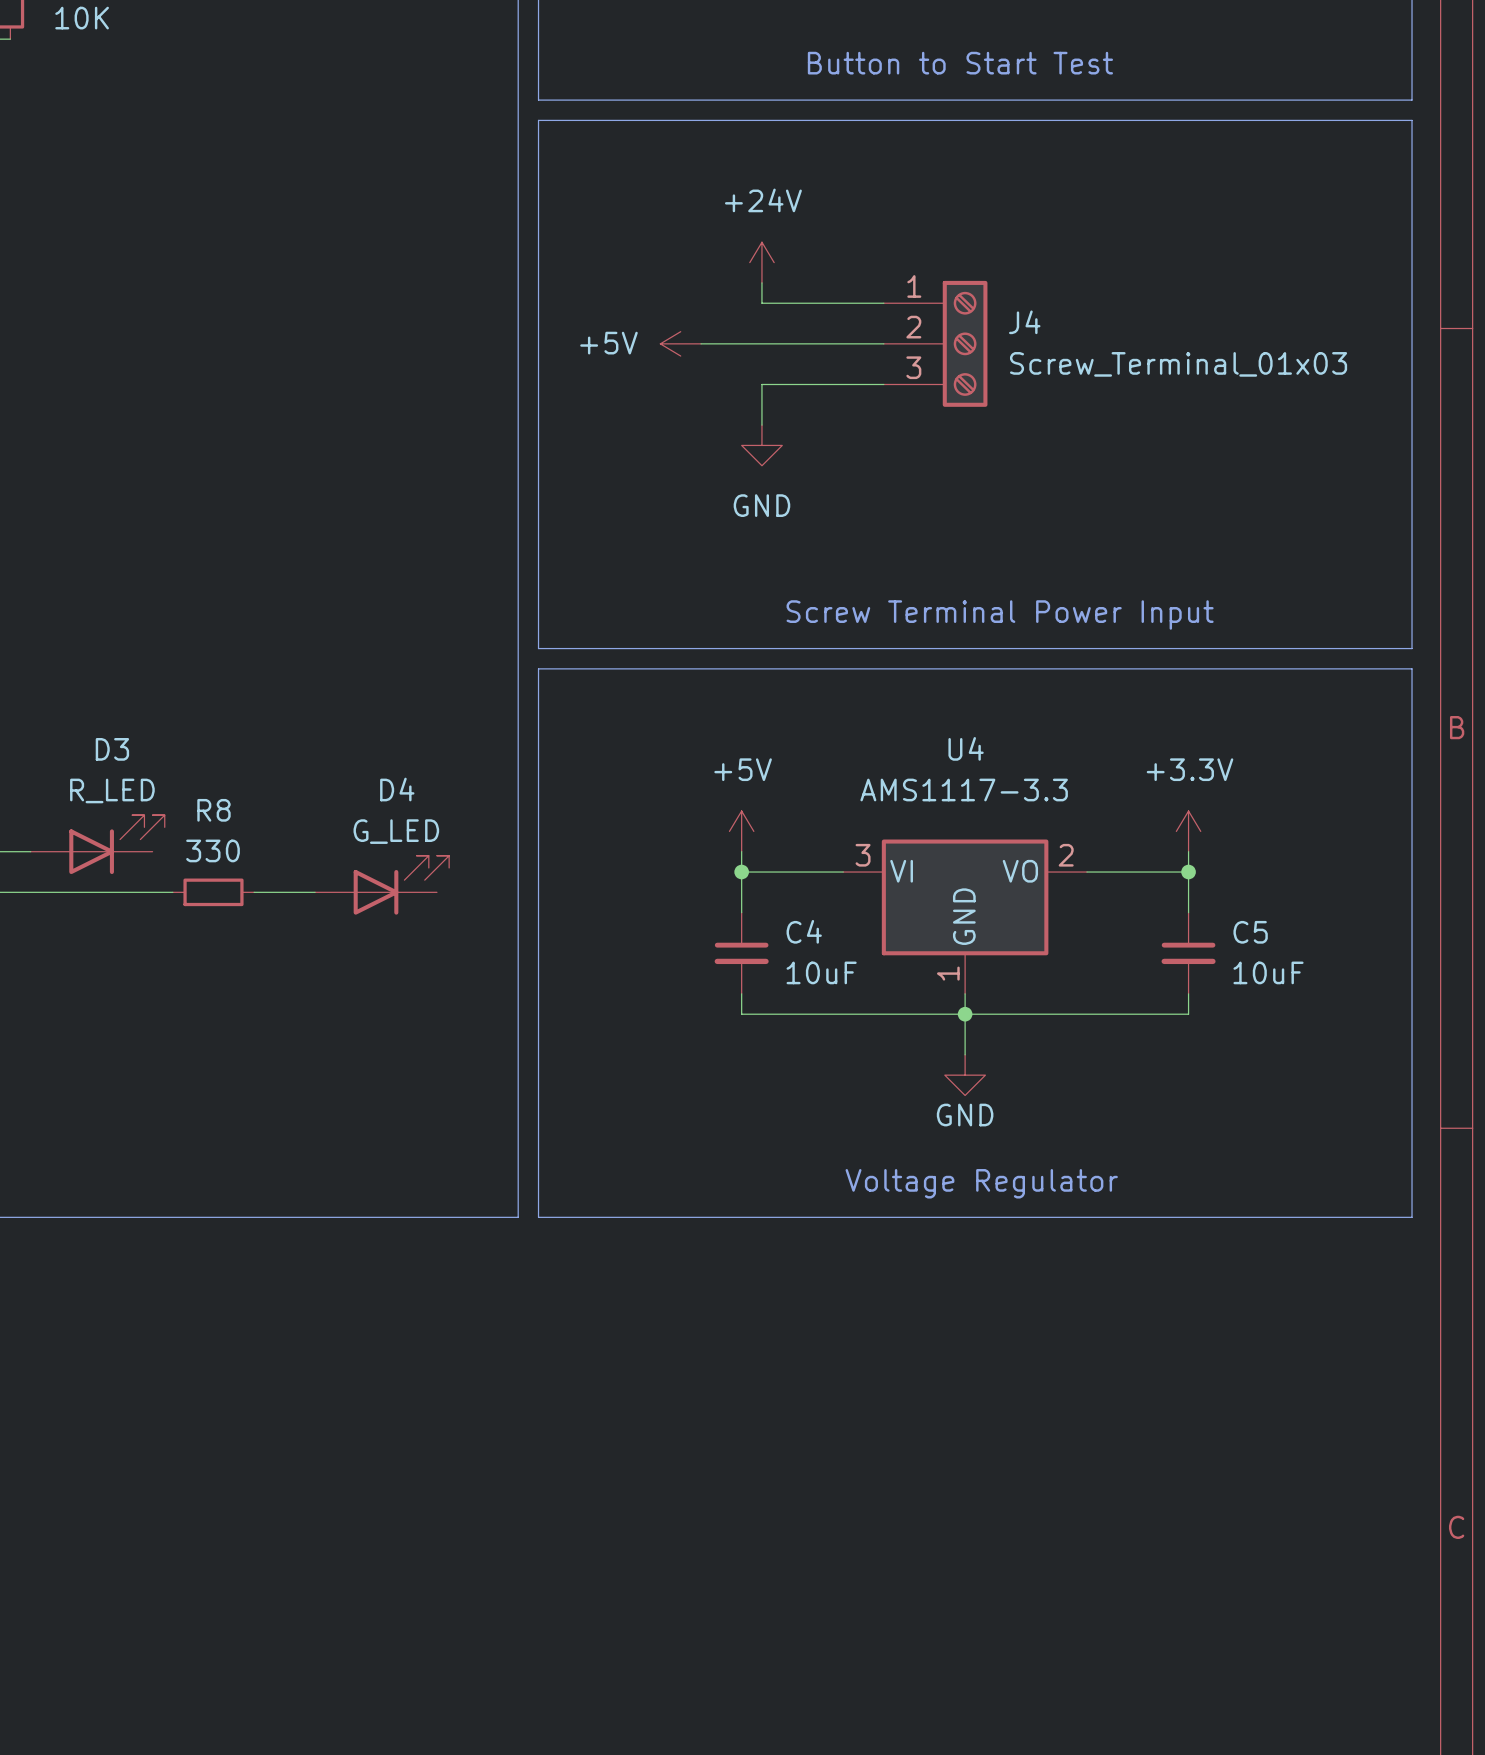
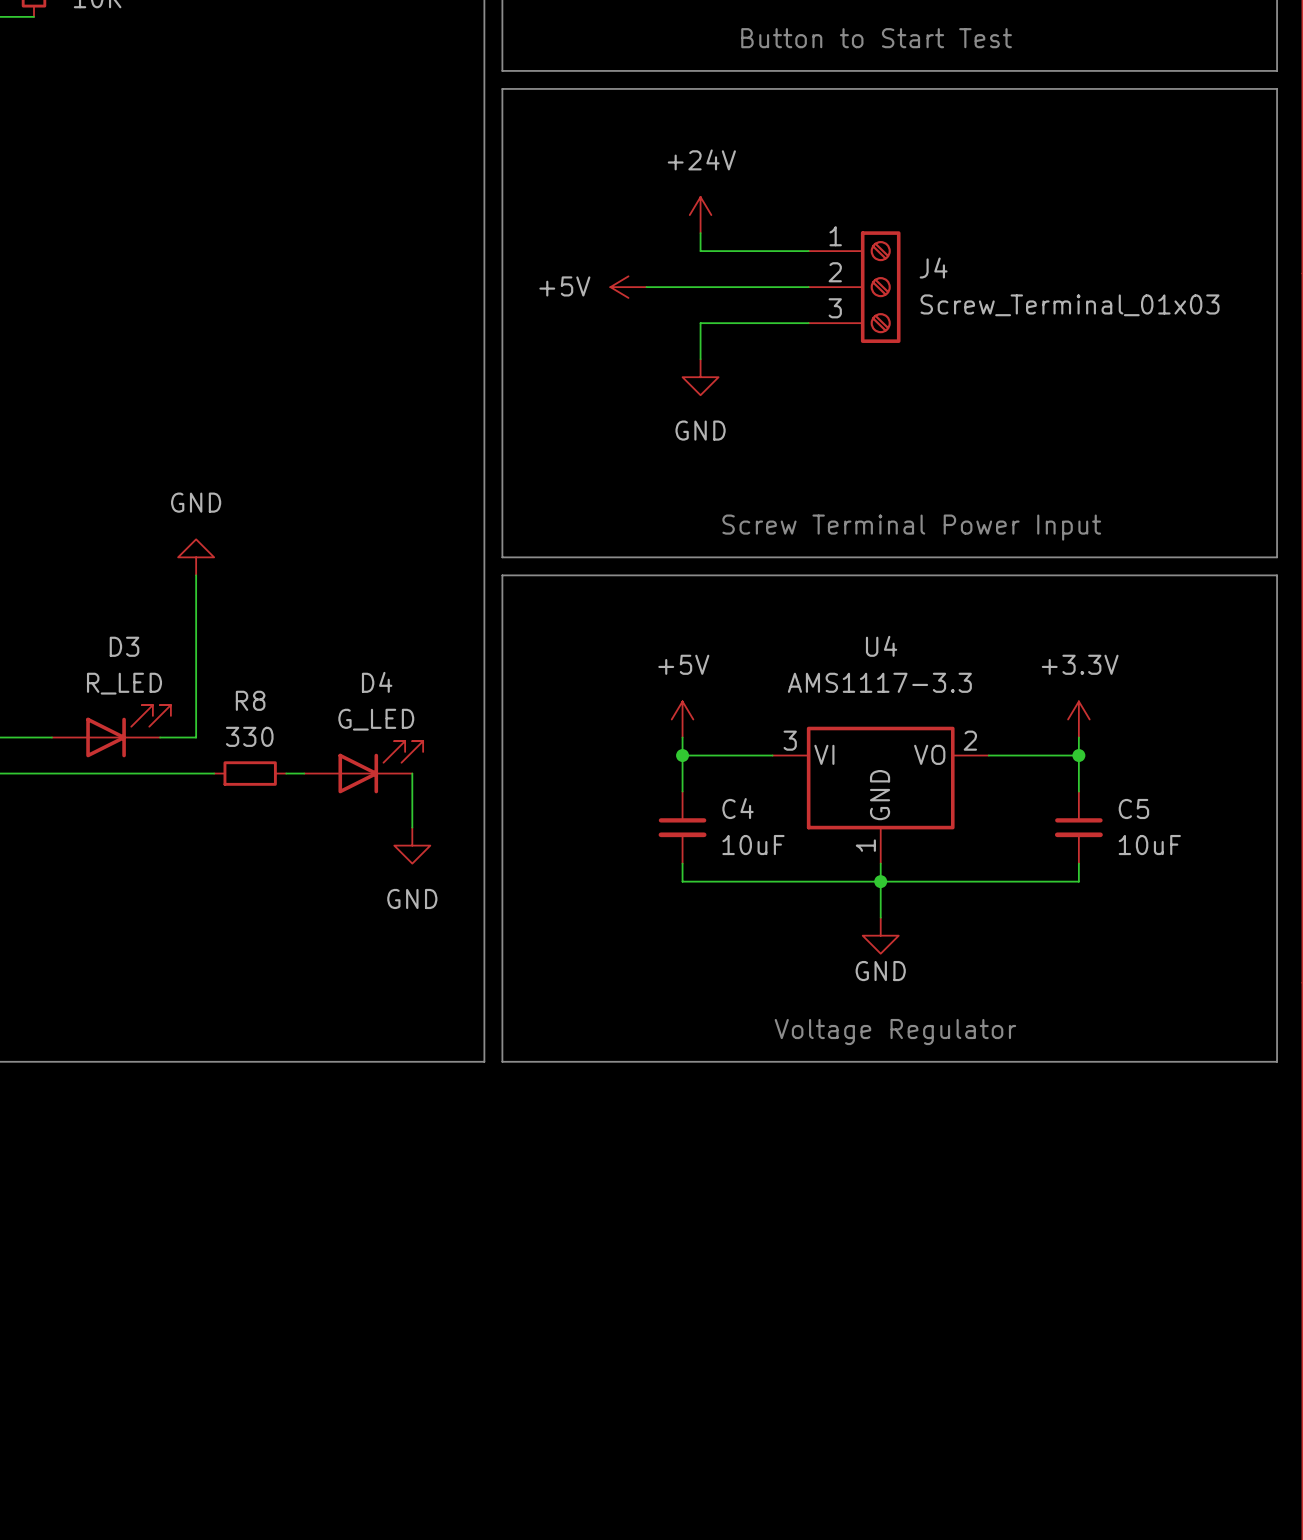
power symbol: none -> GND (196, 557)
wire: none -> (196, 575) (196, 737) (160, 737)
R8 position: (213, 892) -> (250, 773)
wire: (254, 892) (294, 892) -> (178, 773) (214, 773)
wire: none -> (412, 773) (412, 827)
power symbol: none -> GND (412, 845)

